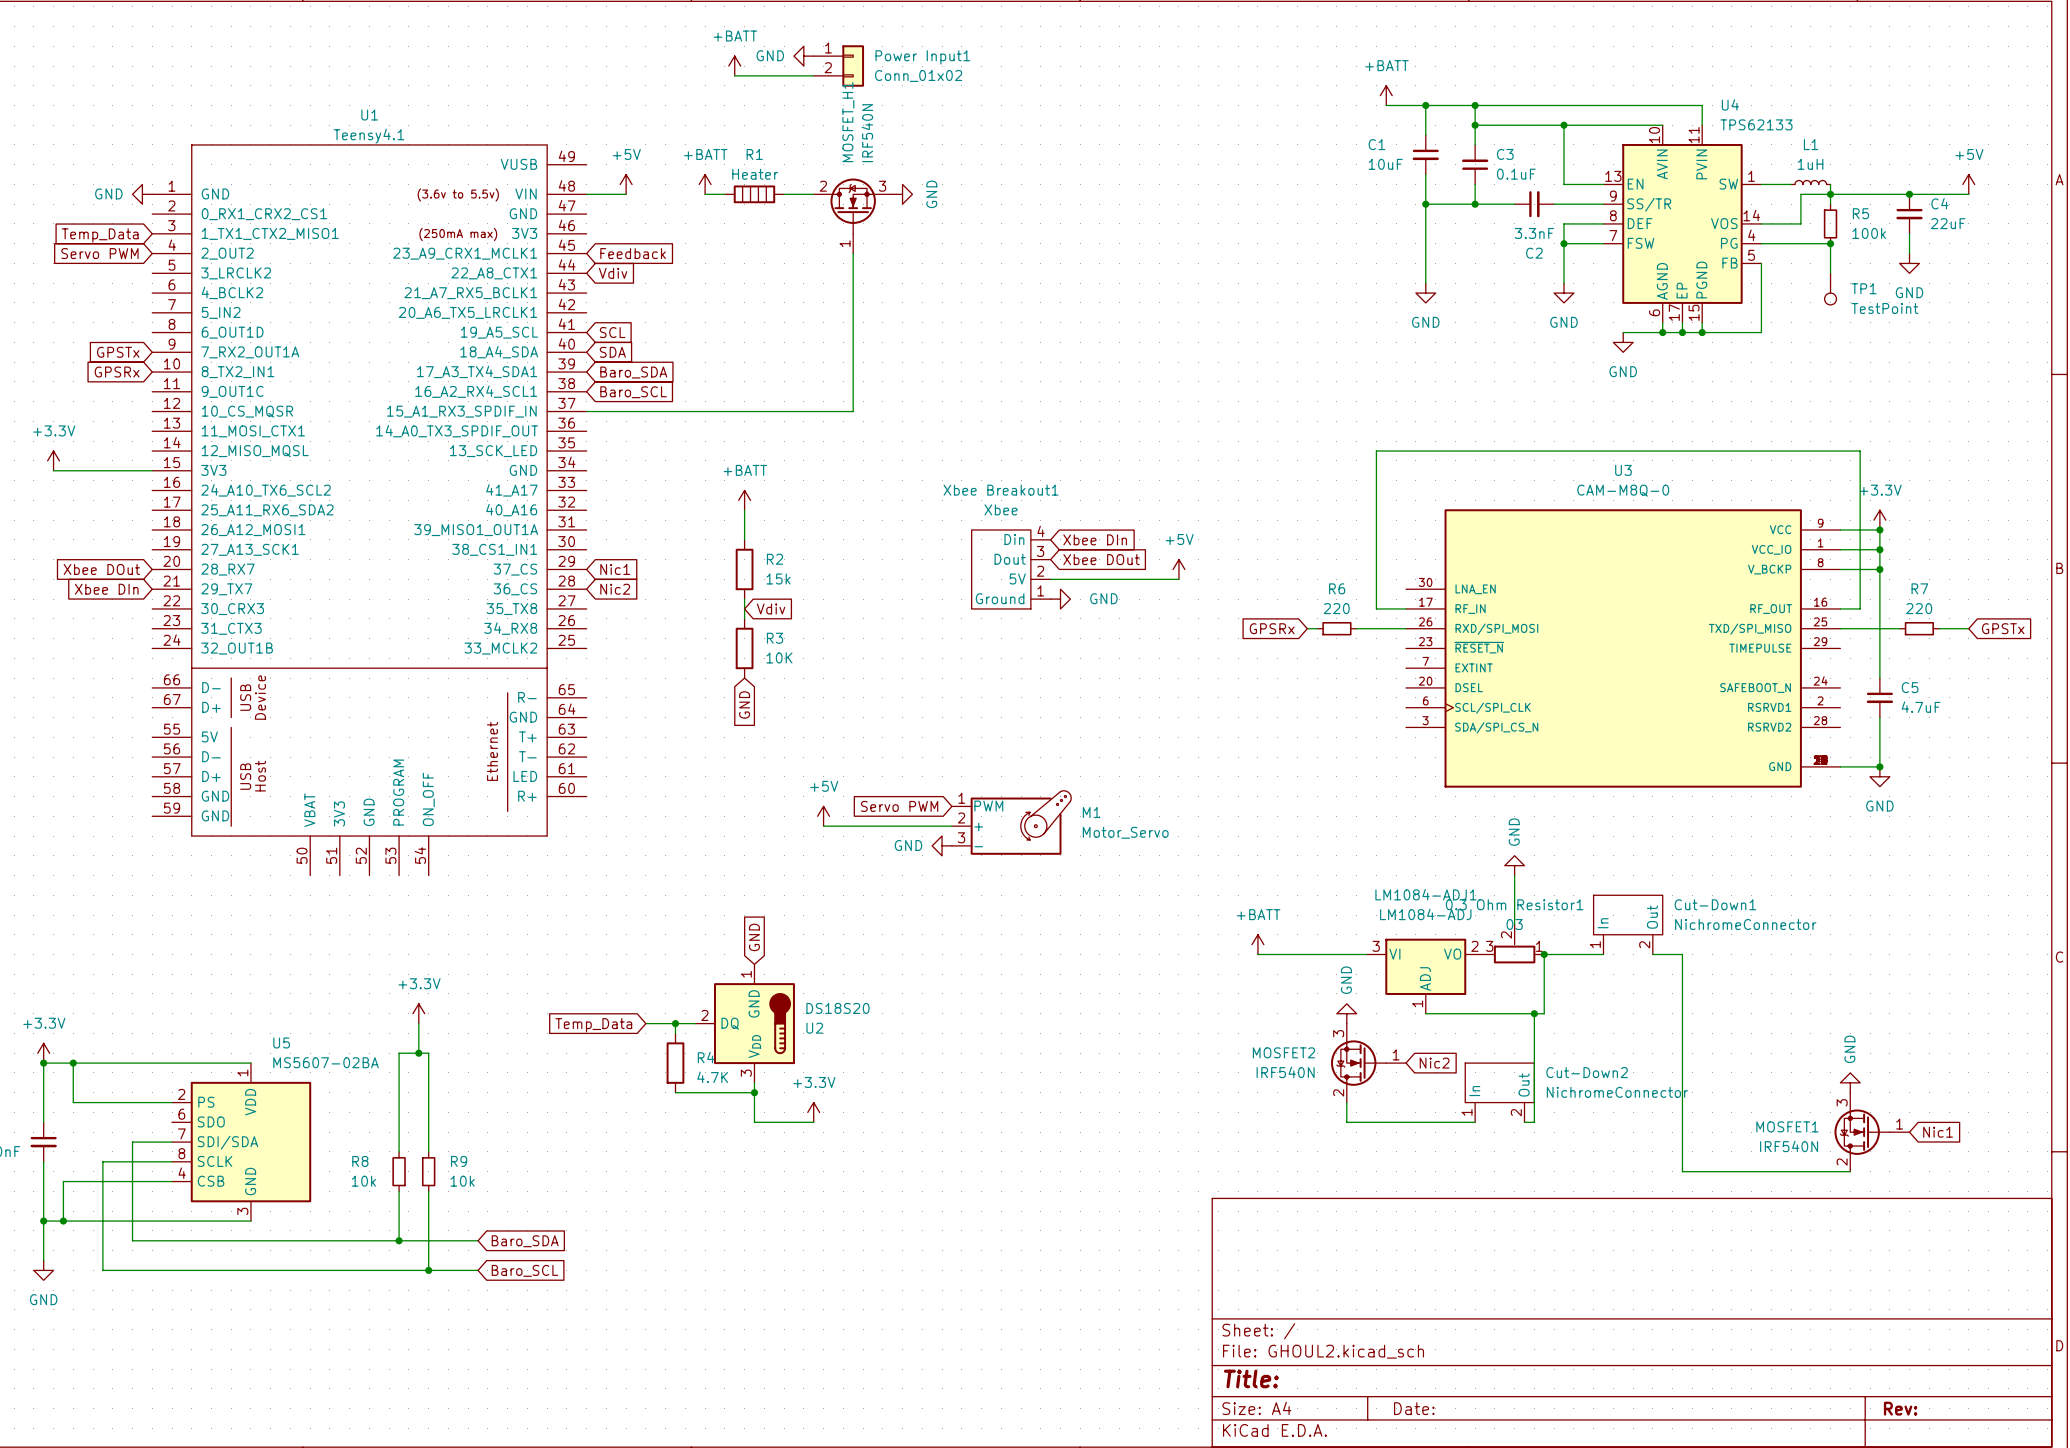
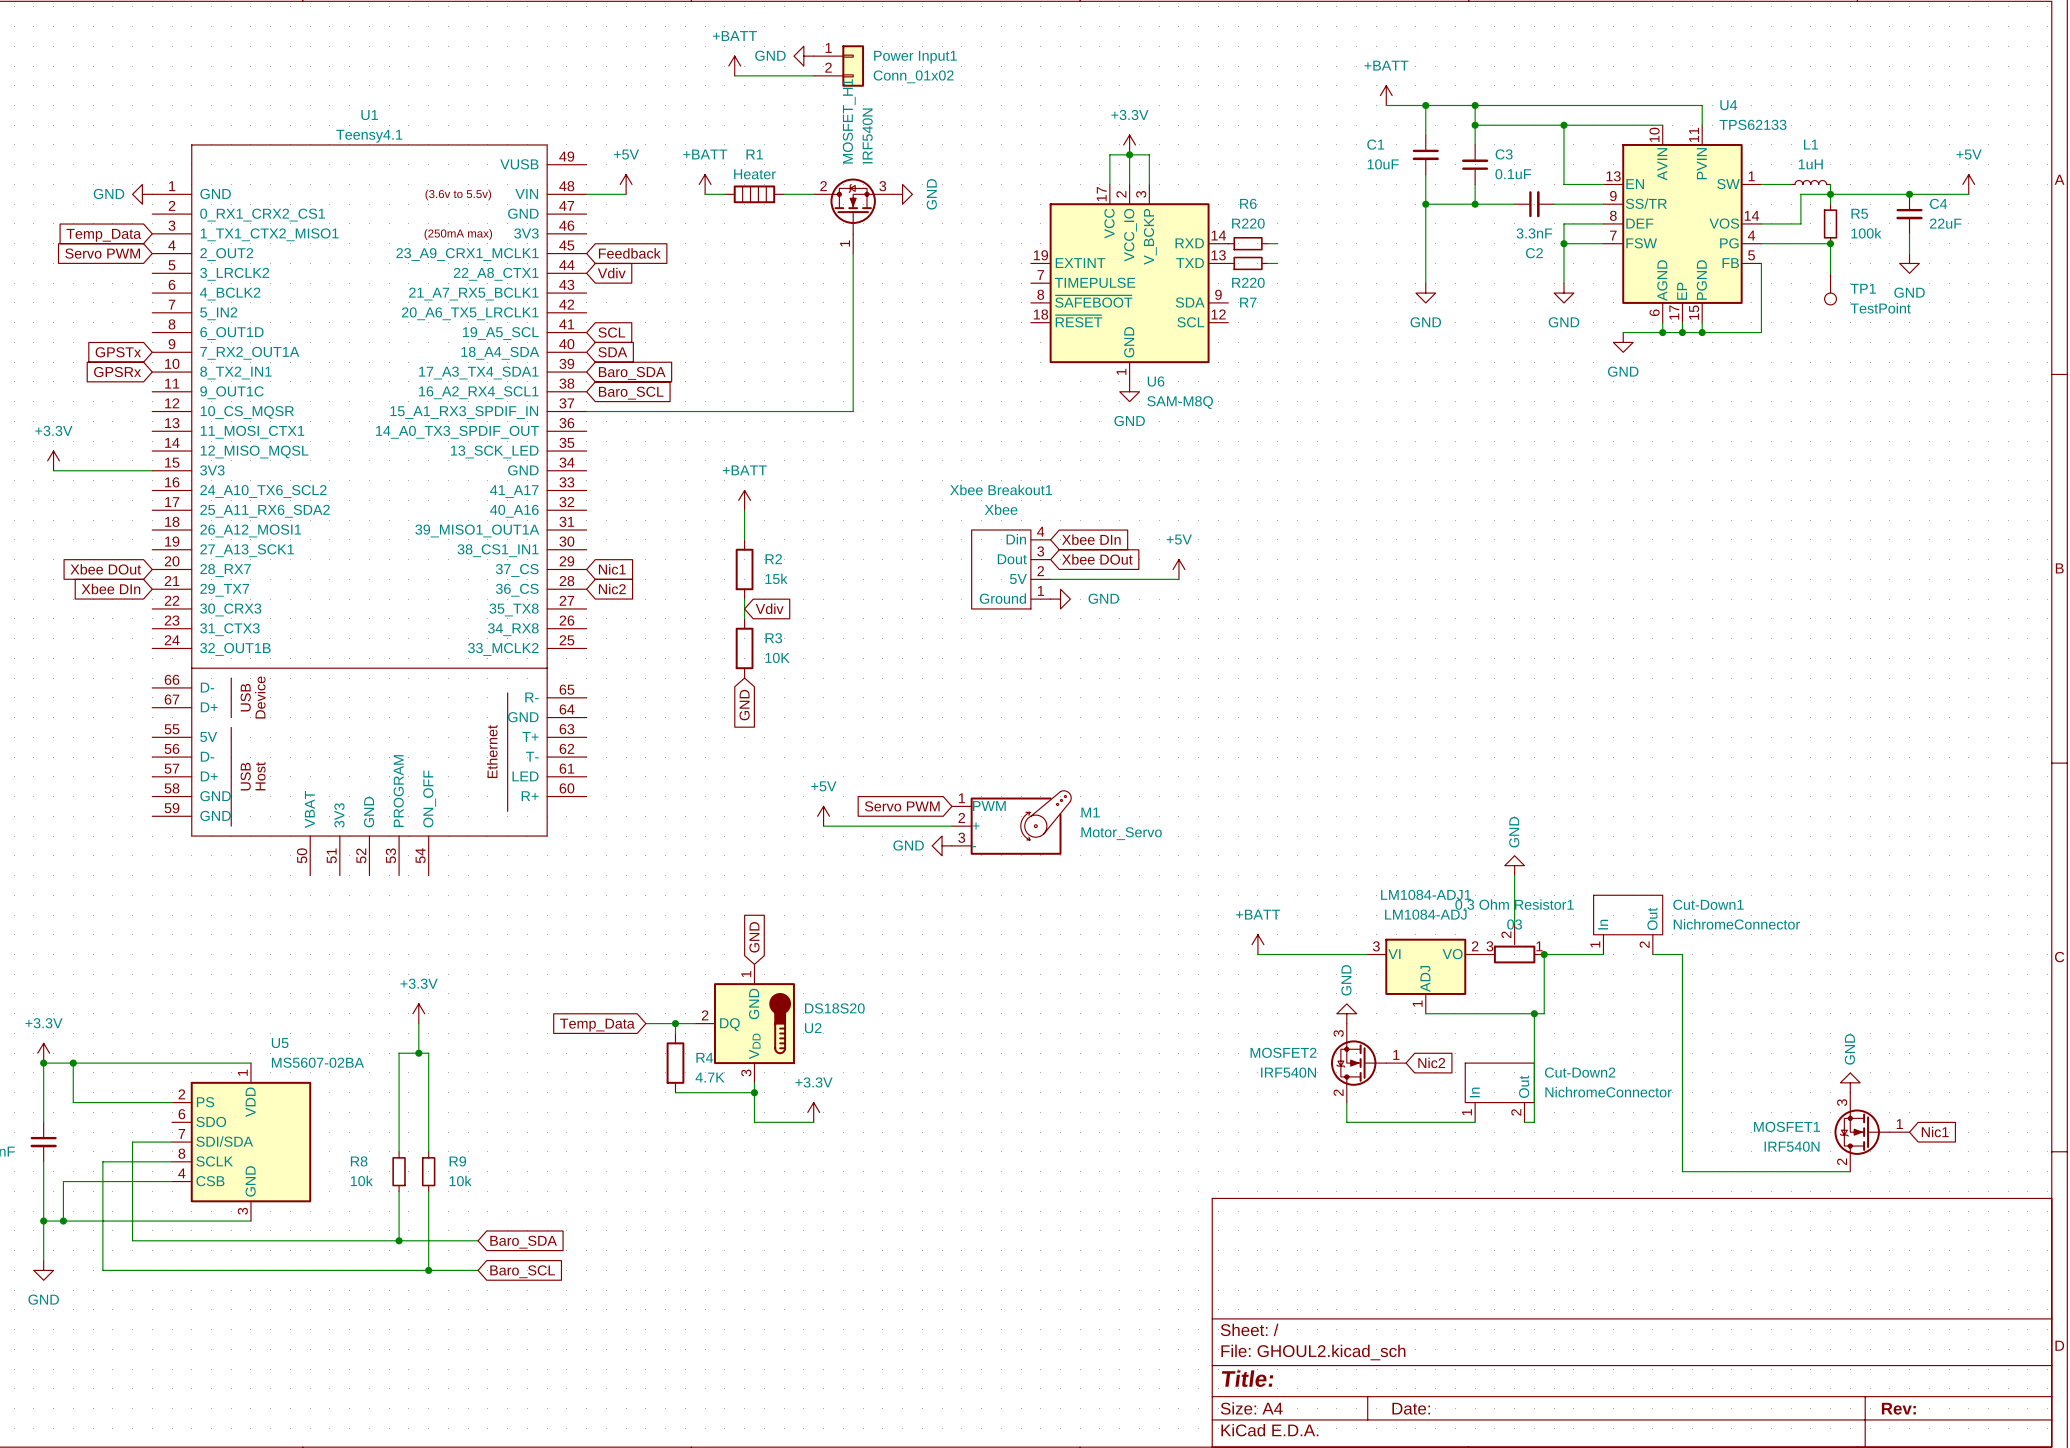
power symbol: none -> +3.3V (1129, 144)
wire: none -> (1129, 154) (1129, 184)
junction: none -> (1129, 154)
wire: none -> (1109, 184) (1109, 154) (1149, 154) (1149, 184)
wire: none -> (1267, 243) (1277, 243)
wire: none -> (1267, 263) (1277, 263)
U6: none -> SAM-M8Q (1129, 283)
power symbol: none -> GND (1129, 391)
power symbol: +3.3V (1879, 520) -> none
wire: (1840, 529) (1879, 529) (1879, 678) -> none
junction: (1879, 529) -> none
wire: (1840, 549) (1879, 549) -> none
junction: (1879, 549) -> none
wire: (1840, 569) (1879, 569) -> none
junction: (1879, 569) -> none
R7 name position: R7 (1919, 588) -> R7 (1248, 302)
R6 value: 220 (1336, 608) -> R220 (1248, 223)
wire: (1406, 608) (1376, 608) (1376, 451) (1860, 451) (1860, 608) (1840, 608) -> none
R7 value: 220 (1919, 608) -> R220 (1248, 282)
global label: GPSRx (1272, 628) -> none
wire: (1307, 628) (1317, 628) -> none
R6 position: (1336, 628) -> (1248, 243)
wire: (1356, 628) (1406, 628) -> none
wire: (1840, 628) (1899, 628) -> none
R7 position: (1919, 628) -> (1248, 263)
wire: (1939, 628) (1968, 628) -> none
global label: GPSTx (2003, 628) -> none
U3: CAM-M8Q-0 (1623, 648) -> none
C5: 4.7uF (1879, 697) -> none
wire: (1879, 717) (1879, 766) (1840, 766) -> none
junction: (1879, 766) -> none
power symbol: GND (1879, 776) -> none

